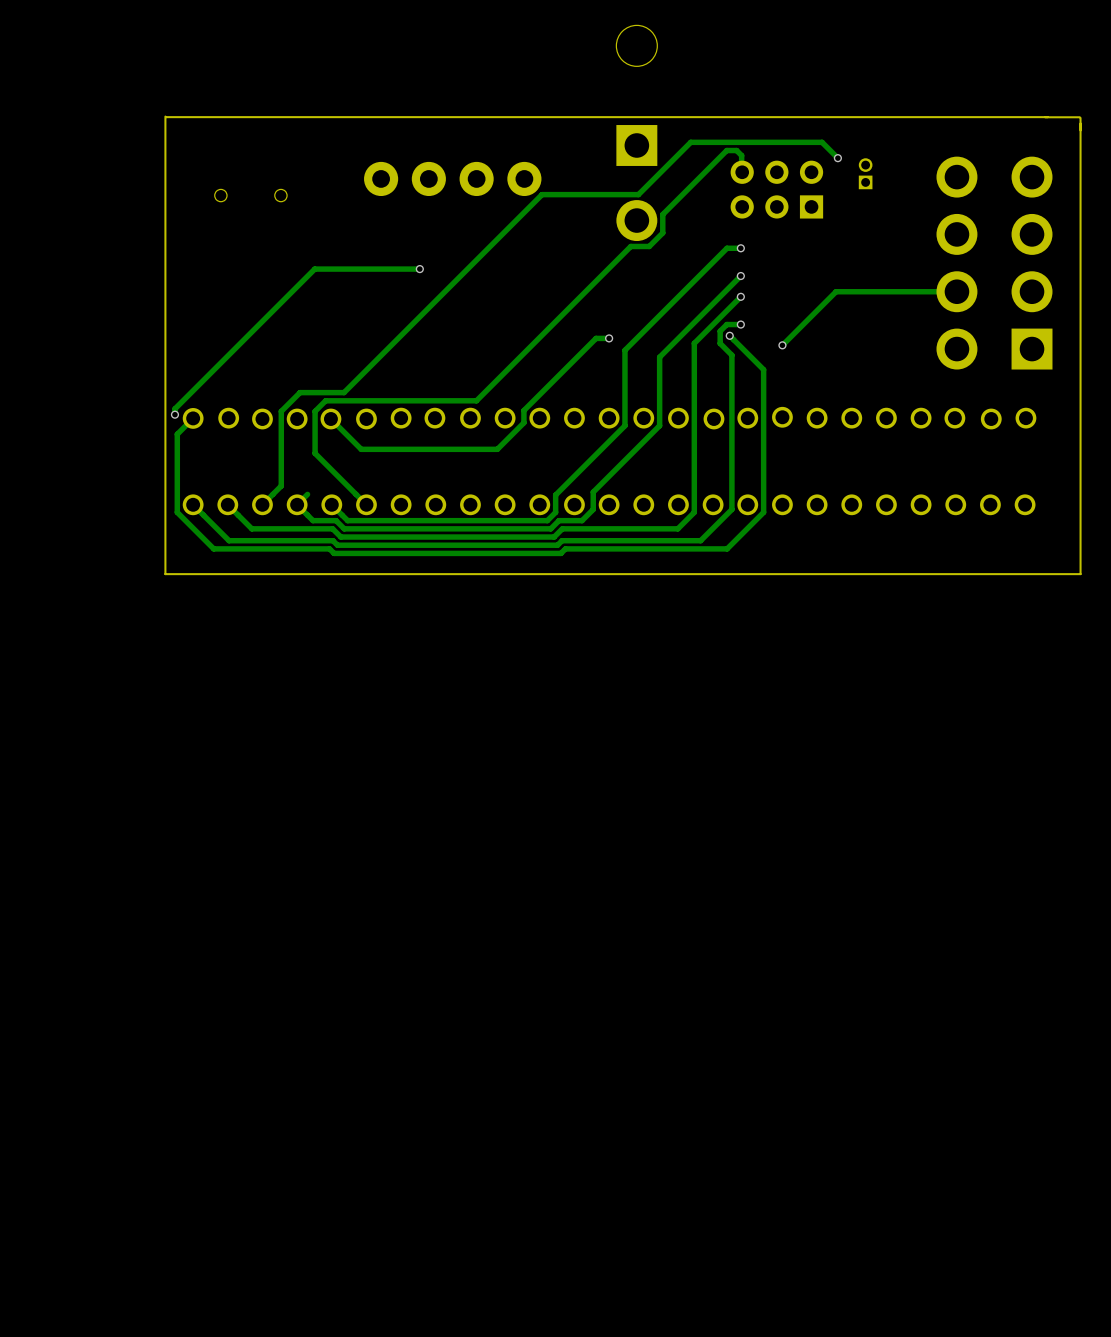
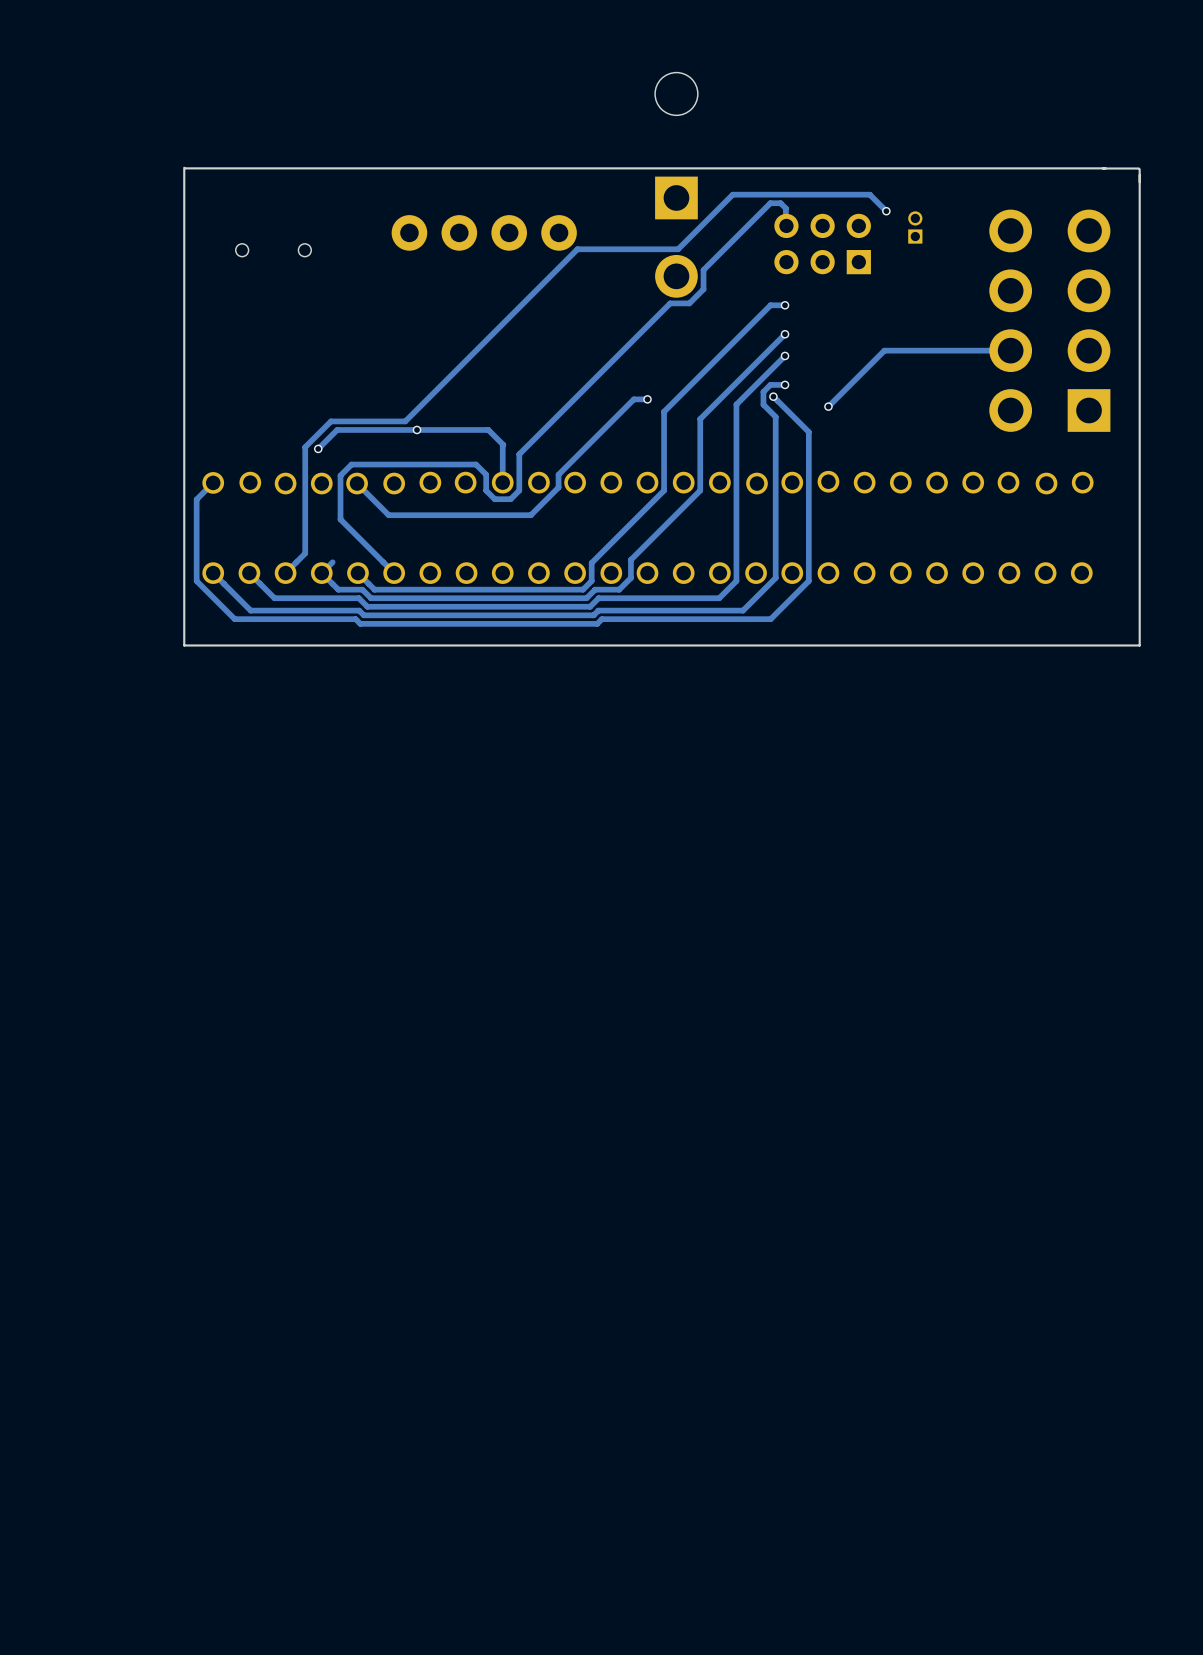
track: (419, 269) (314, 269) (174, 408) (174, 414) -> none
via: (419, 269) -> none
track: (377, 359) (344, 392) (300, 392) (281, 411) -> (405, 421) (330, 421) (305, 447) (305, 475)
via: none -> (416, 429)
track: none -> (318, 448) (337, 429) (488, 429) (503, 444) (502, 482)
via: none -> (318, 448)
track: (486, 391) (476, 400) (444, 400) -> (519, 454) (519, 490) (510, 499) (494, 499) (486, 490) (486, 474) (476, 464)
via: (174, 414) -> none

